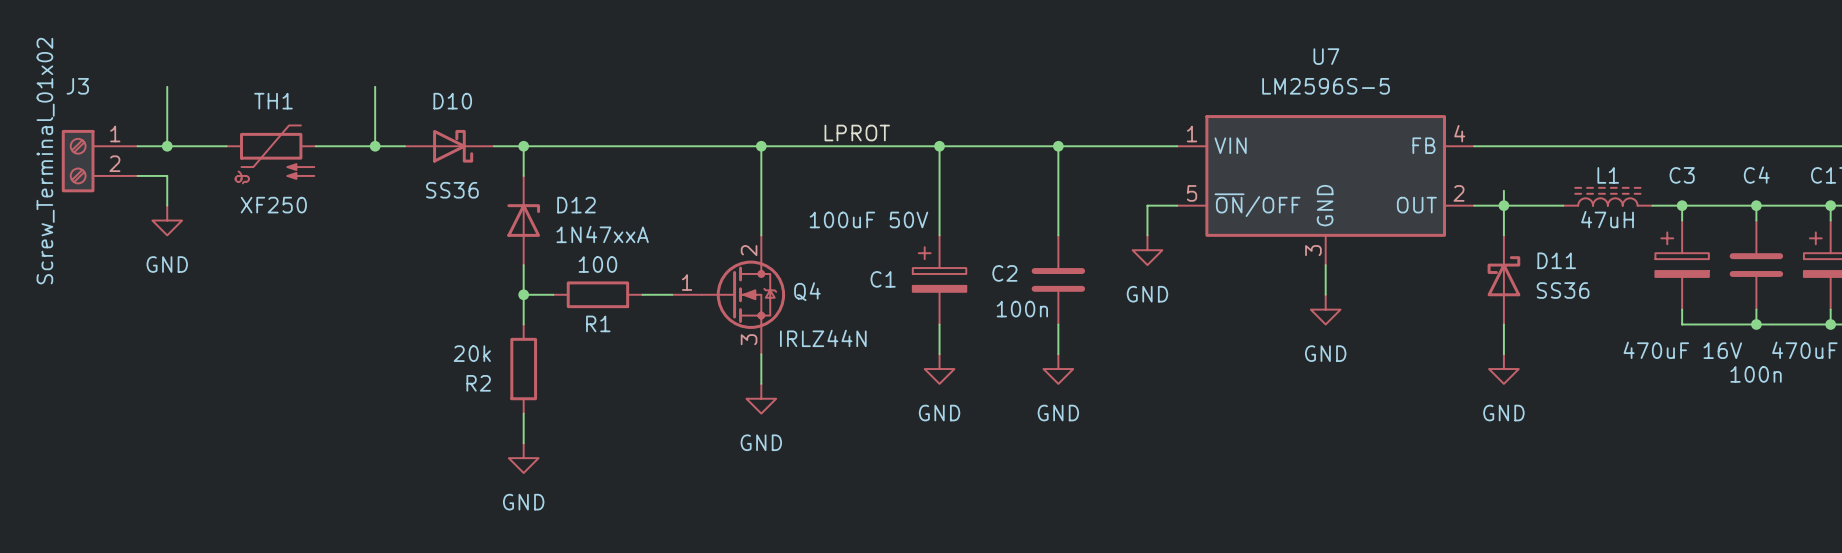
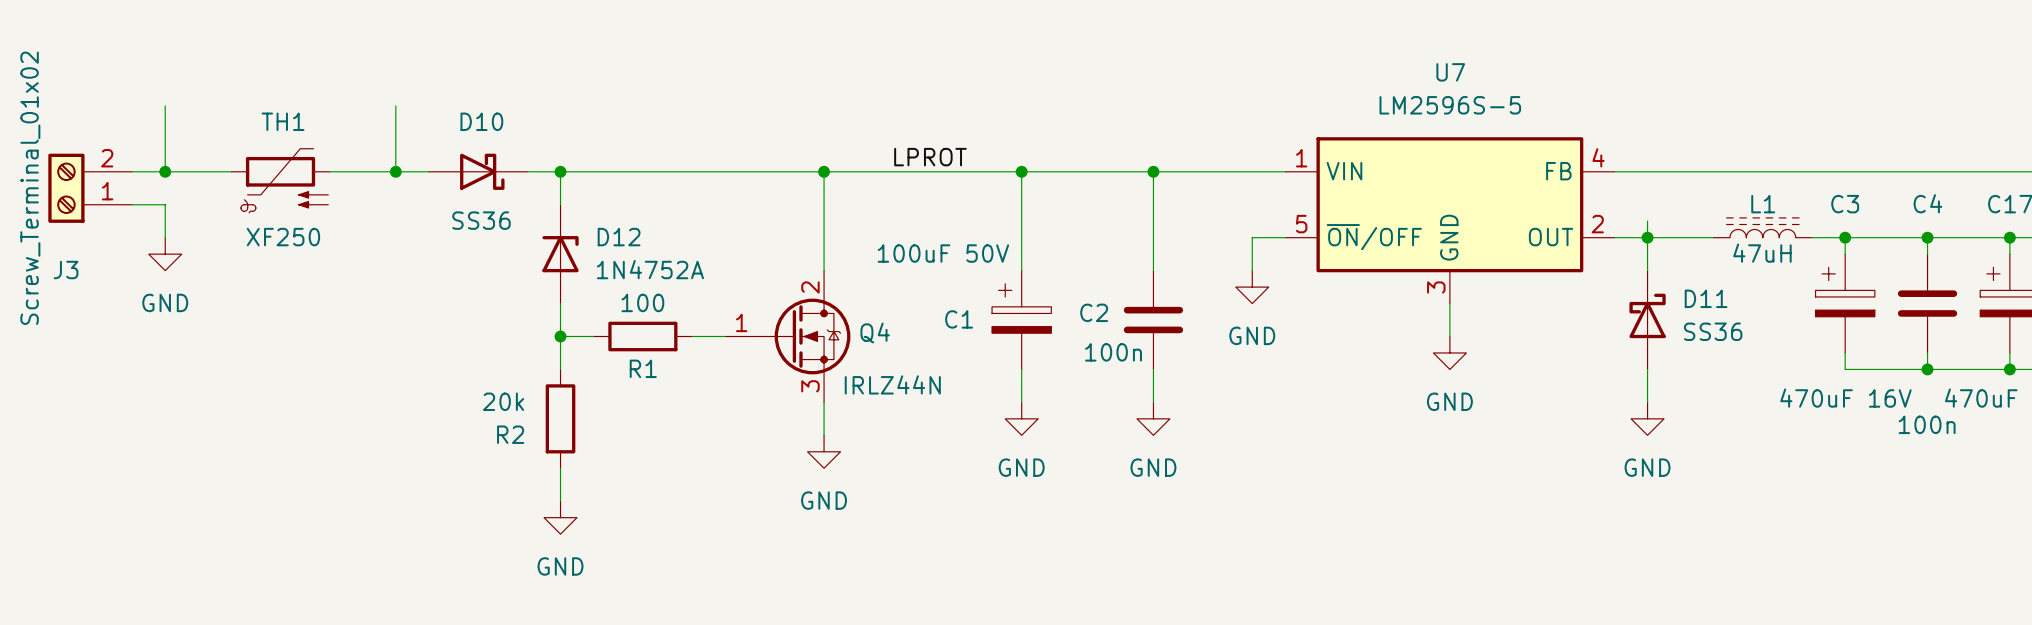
J3 flip: as is (78, 161) -> up-down (66, 188)
D12 value: 1N47xxA (602, 234) -> 1N4752A (650, 269)

